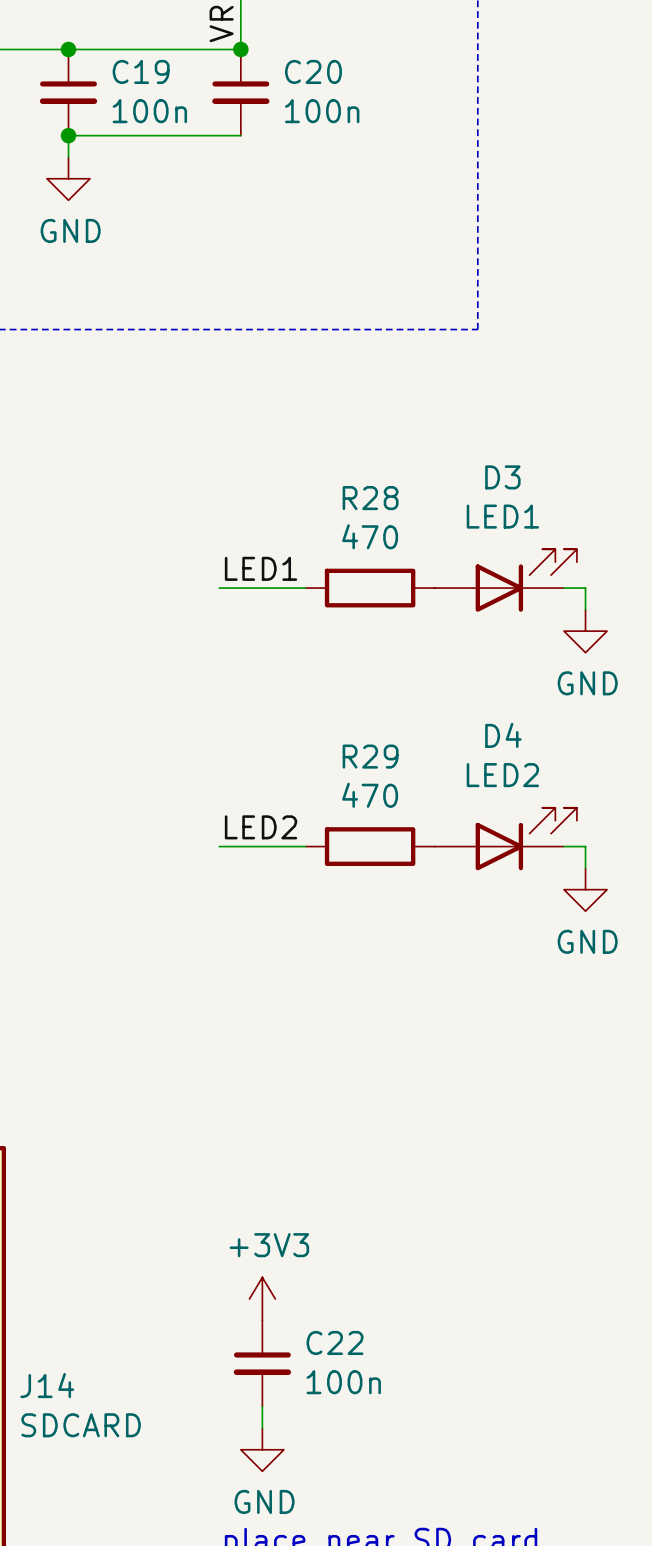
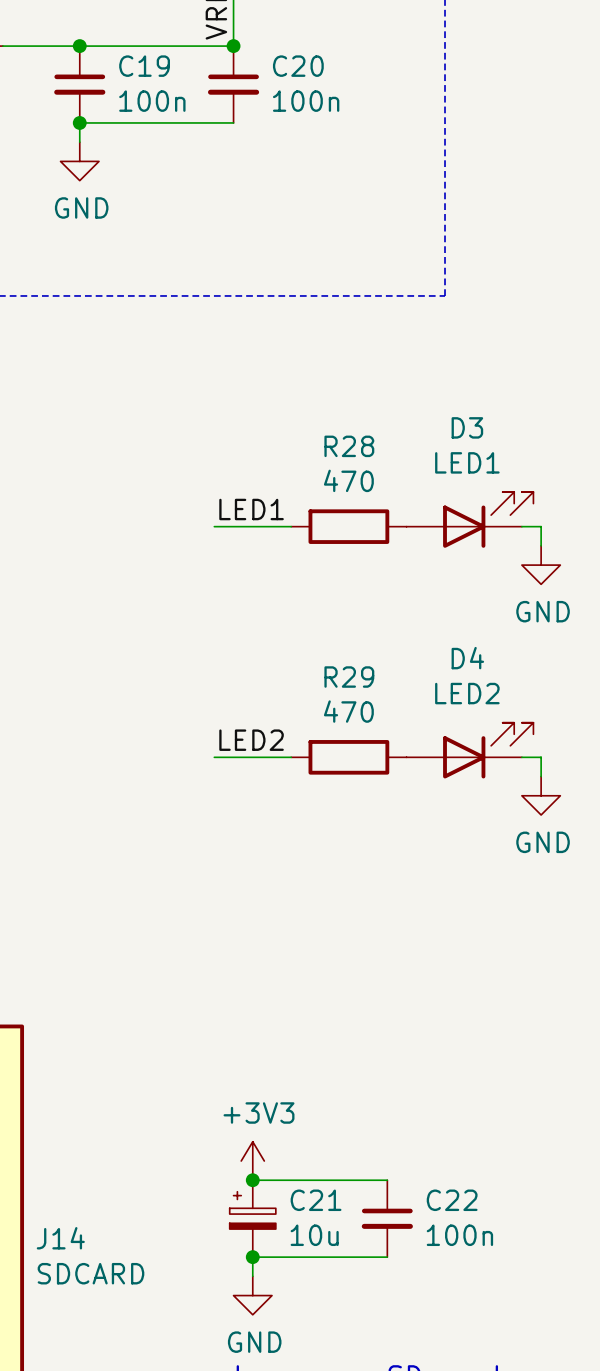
wire: none -> (252, 1180) (387, 1180)
junction: none -> (252, 1180)
C22 position: (262, 1363) -> (387, 1218)
C21: none -> 10u (252, 1218)
wire: none -> (252, 1257) (387, 1257)
junction: none -> (252, 1257)

